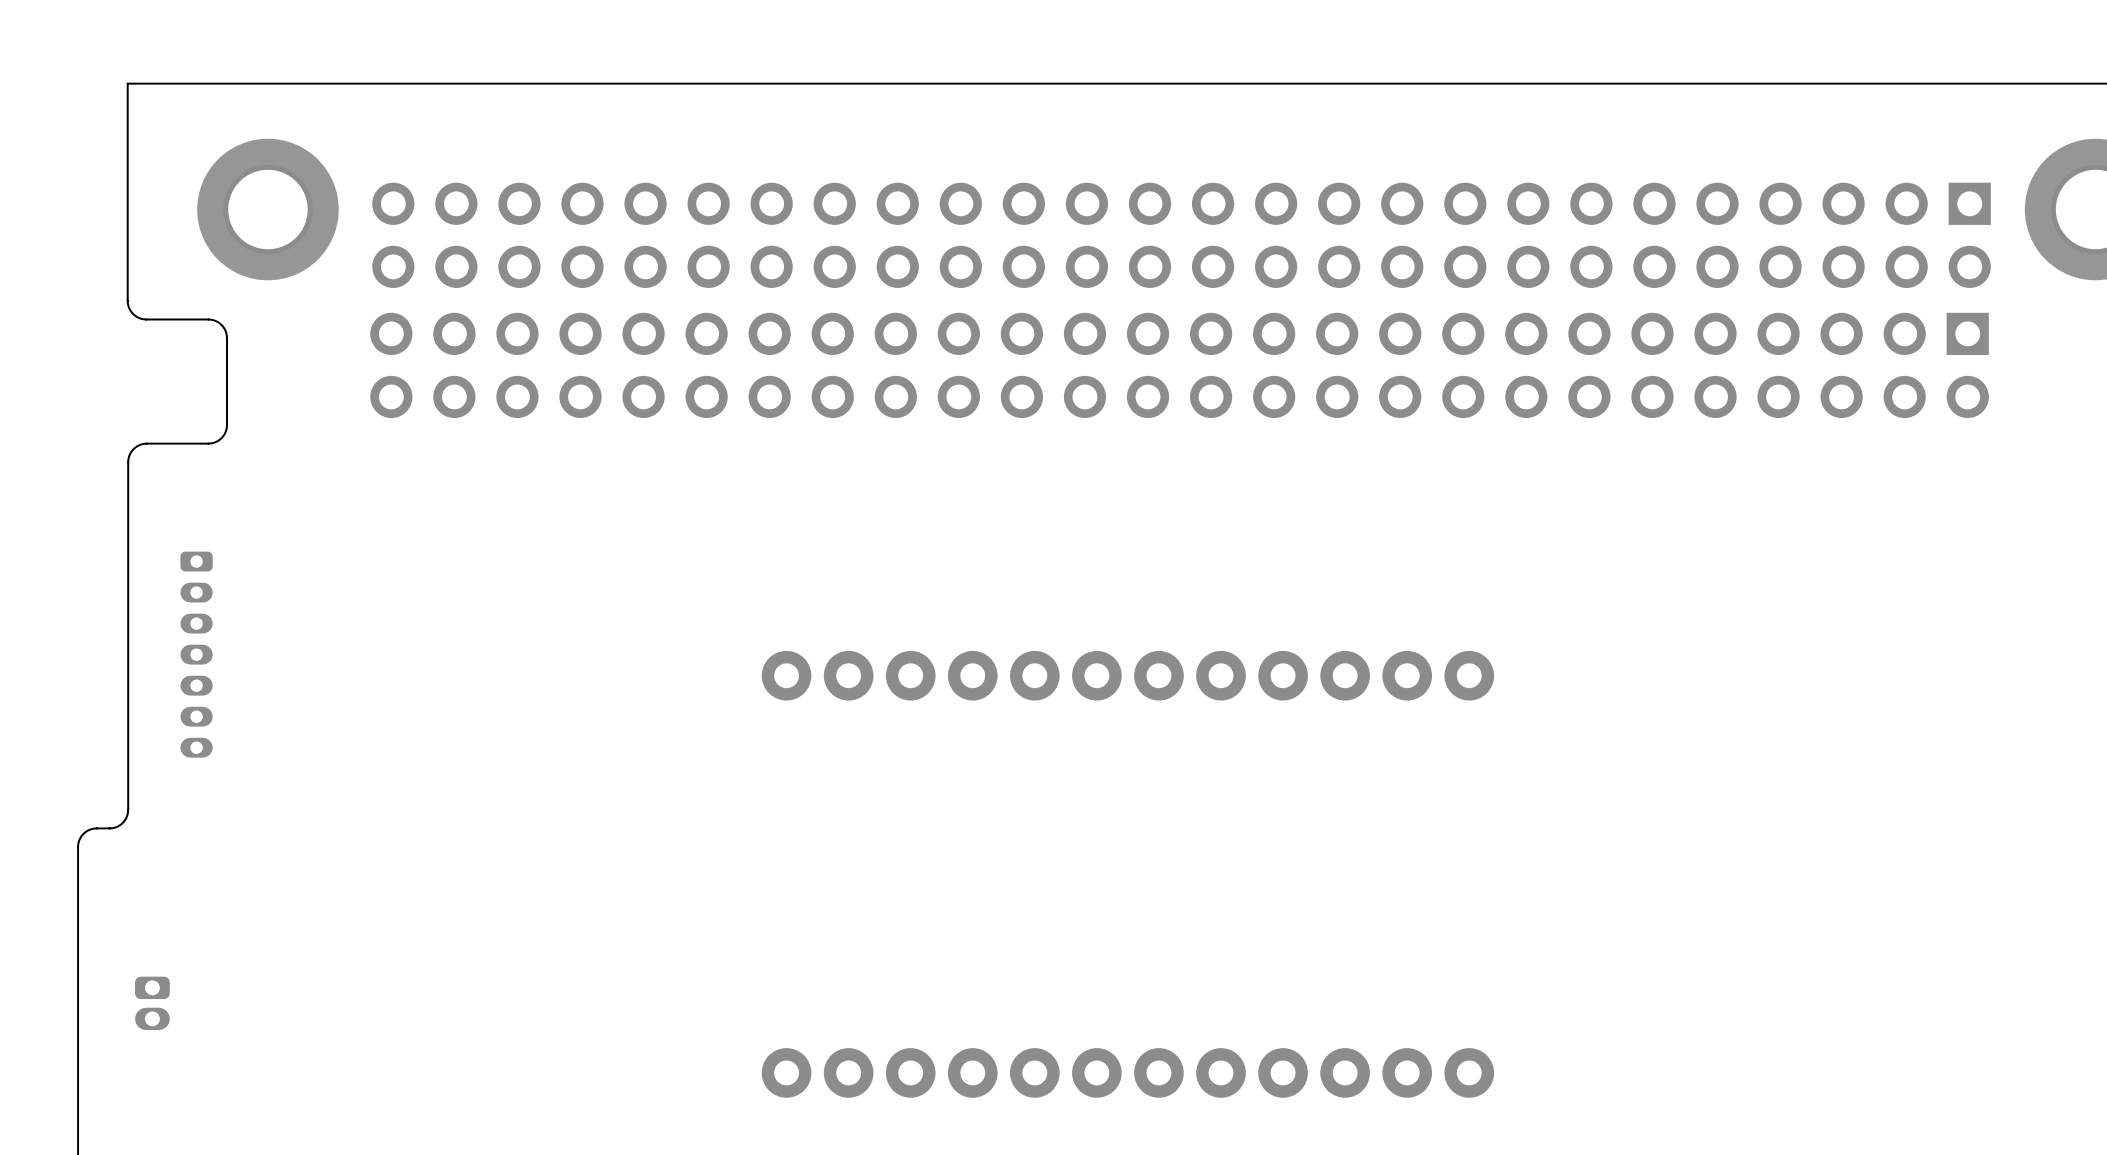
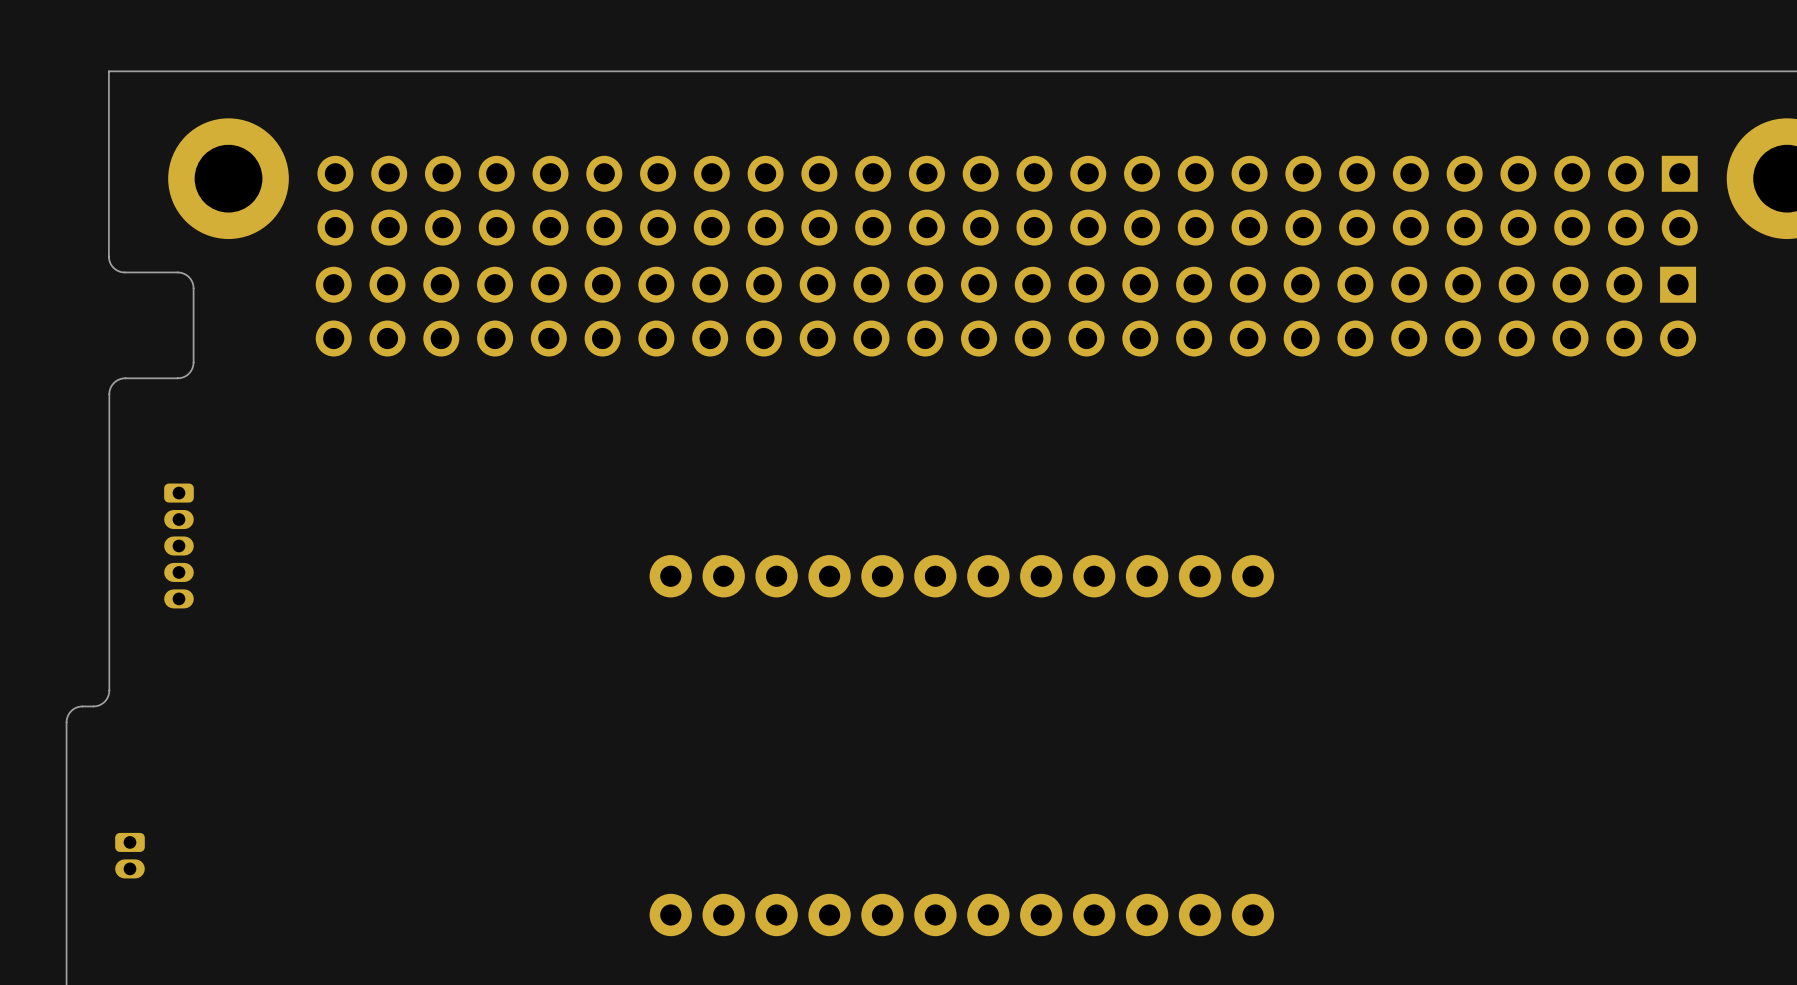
part footprint: [180, 551, 213, 758] -> [164, 483, 194, 609]

